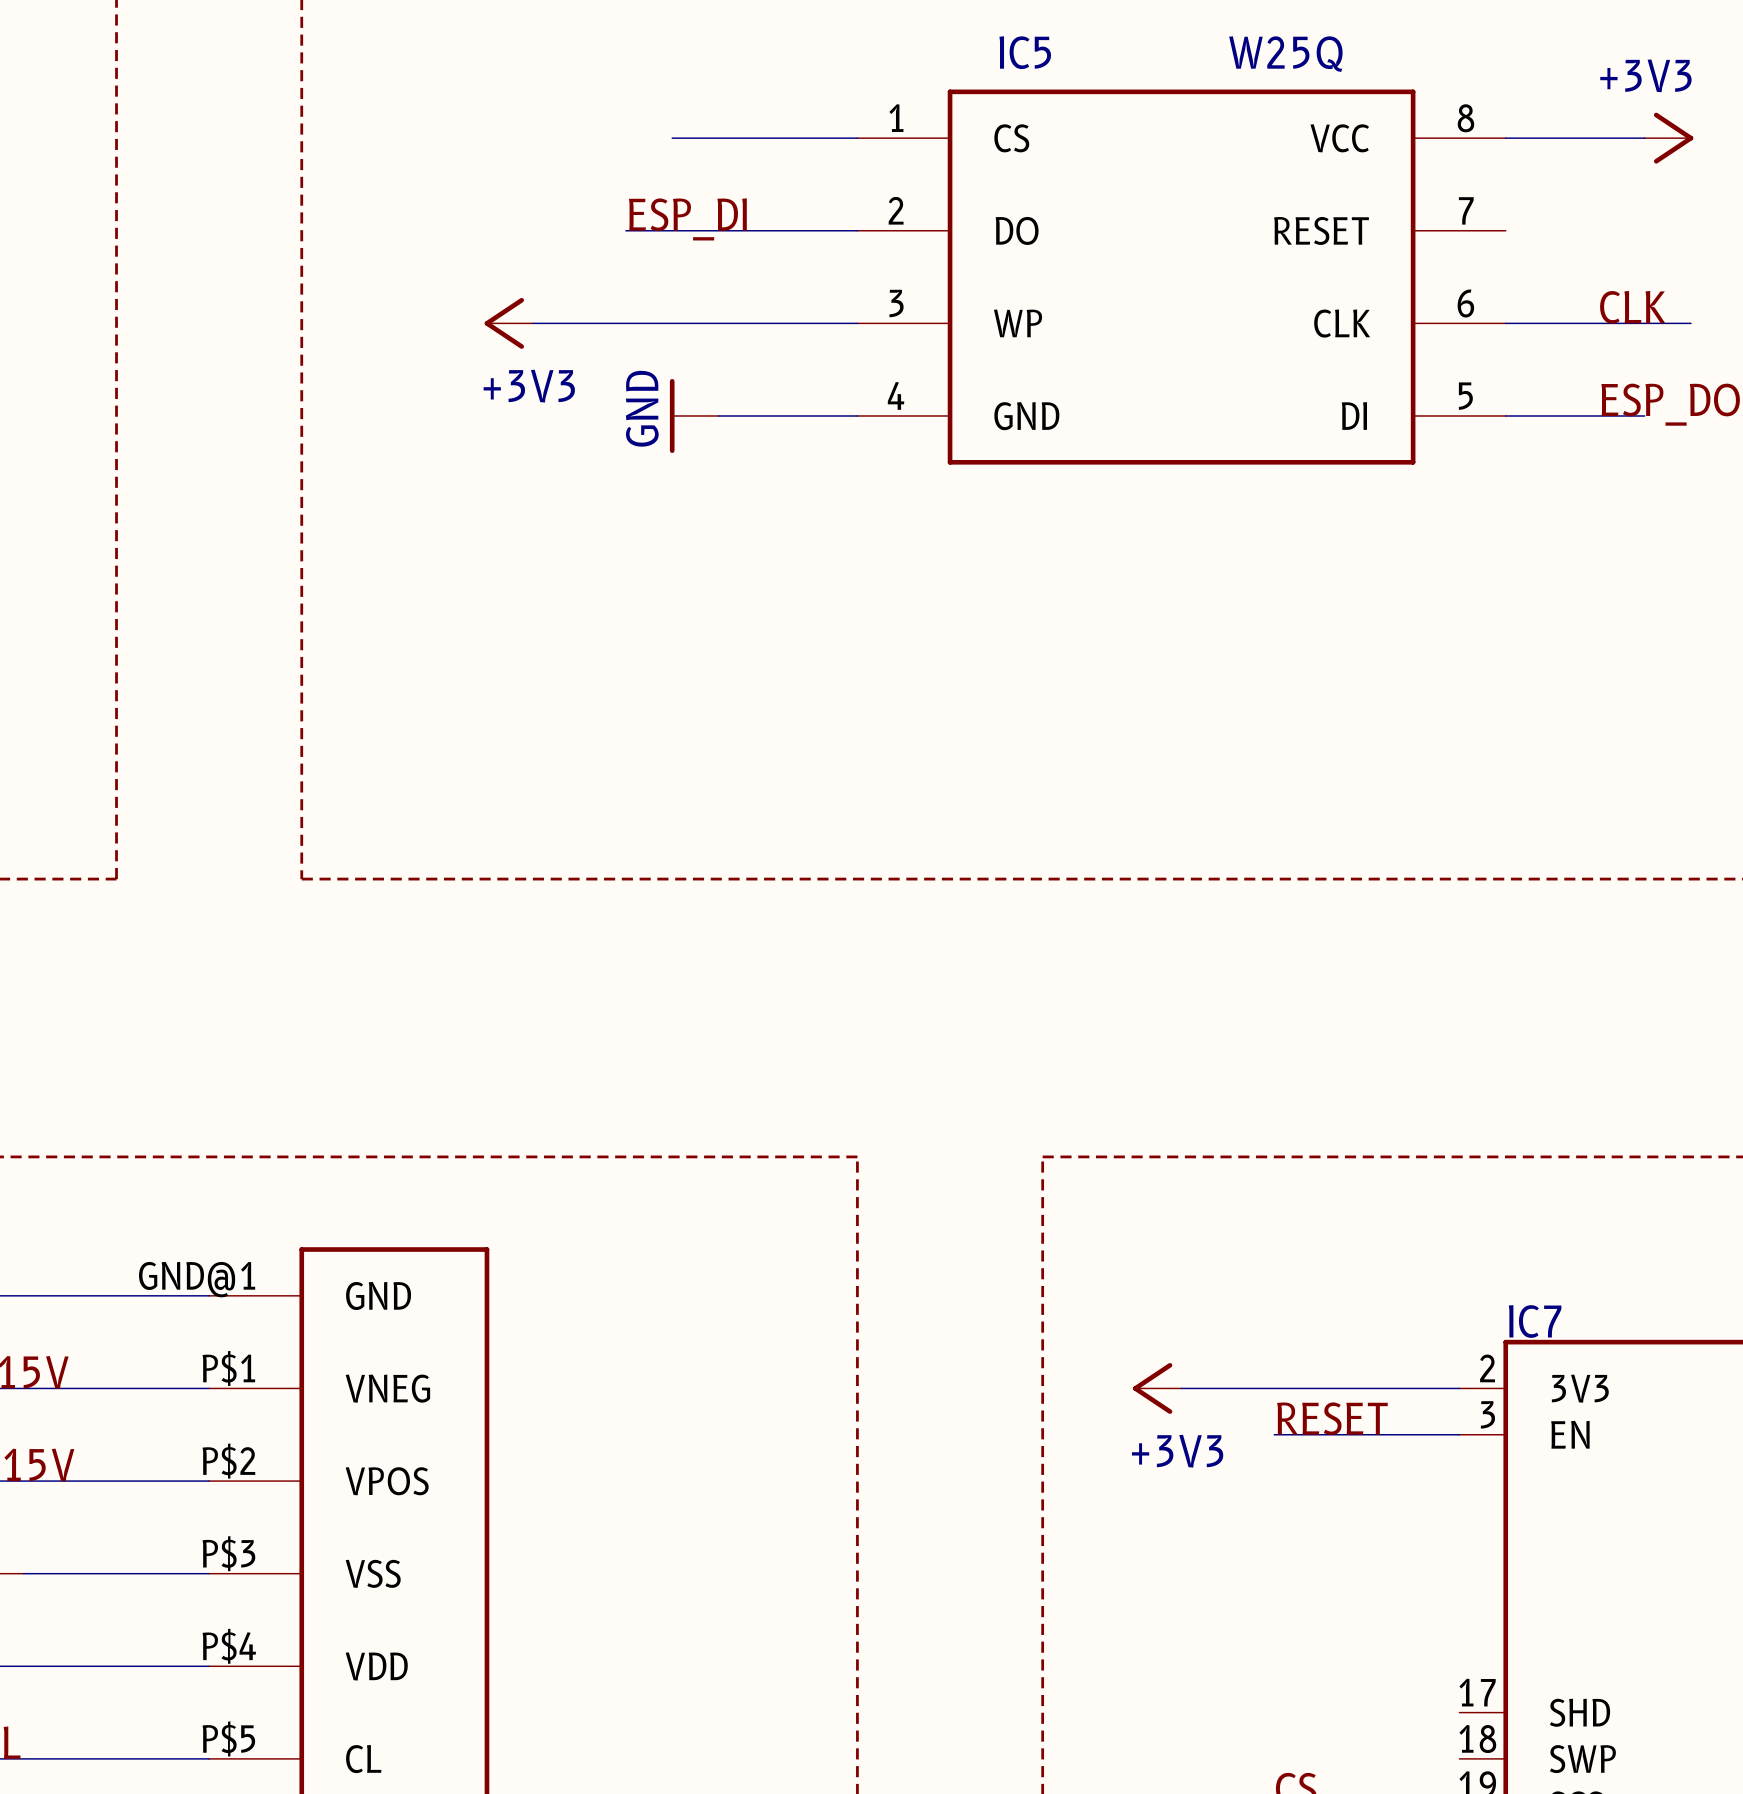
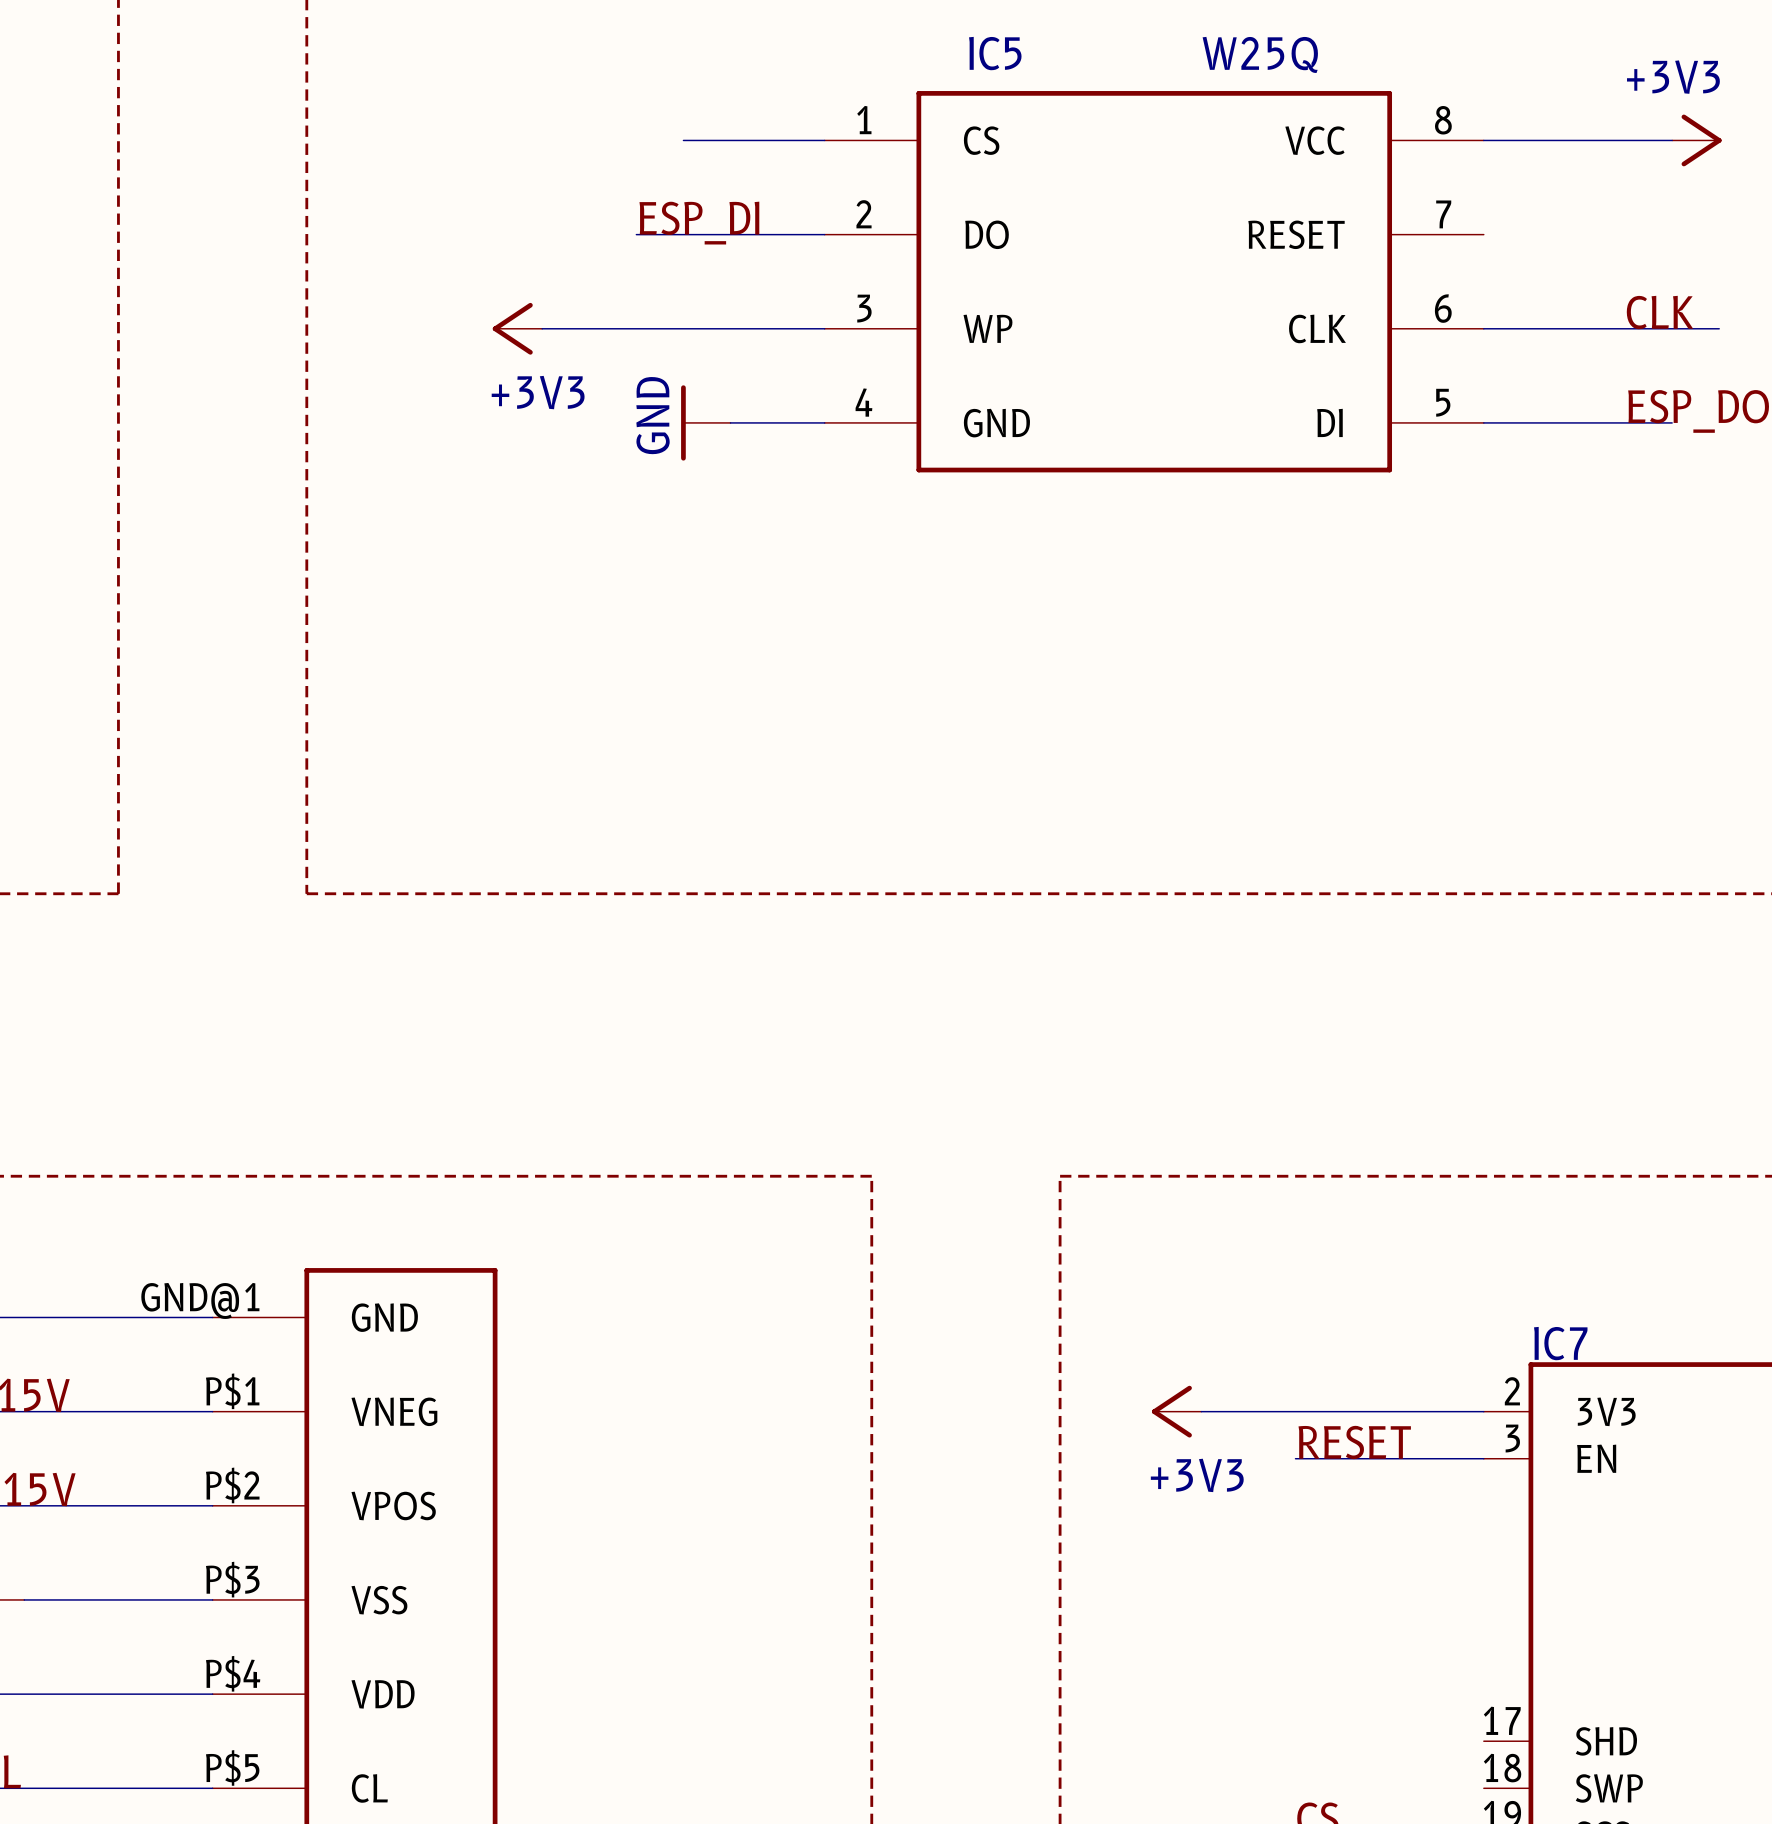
IC5 position: (1181, 277) -> (1154, 281)

